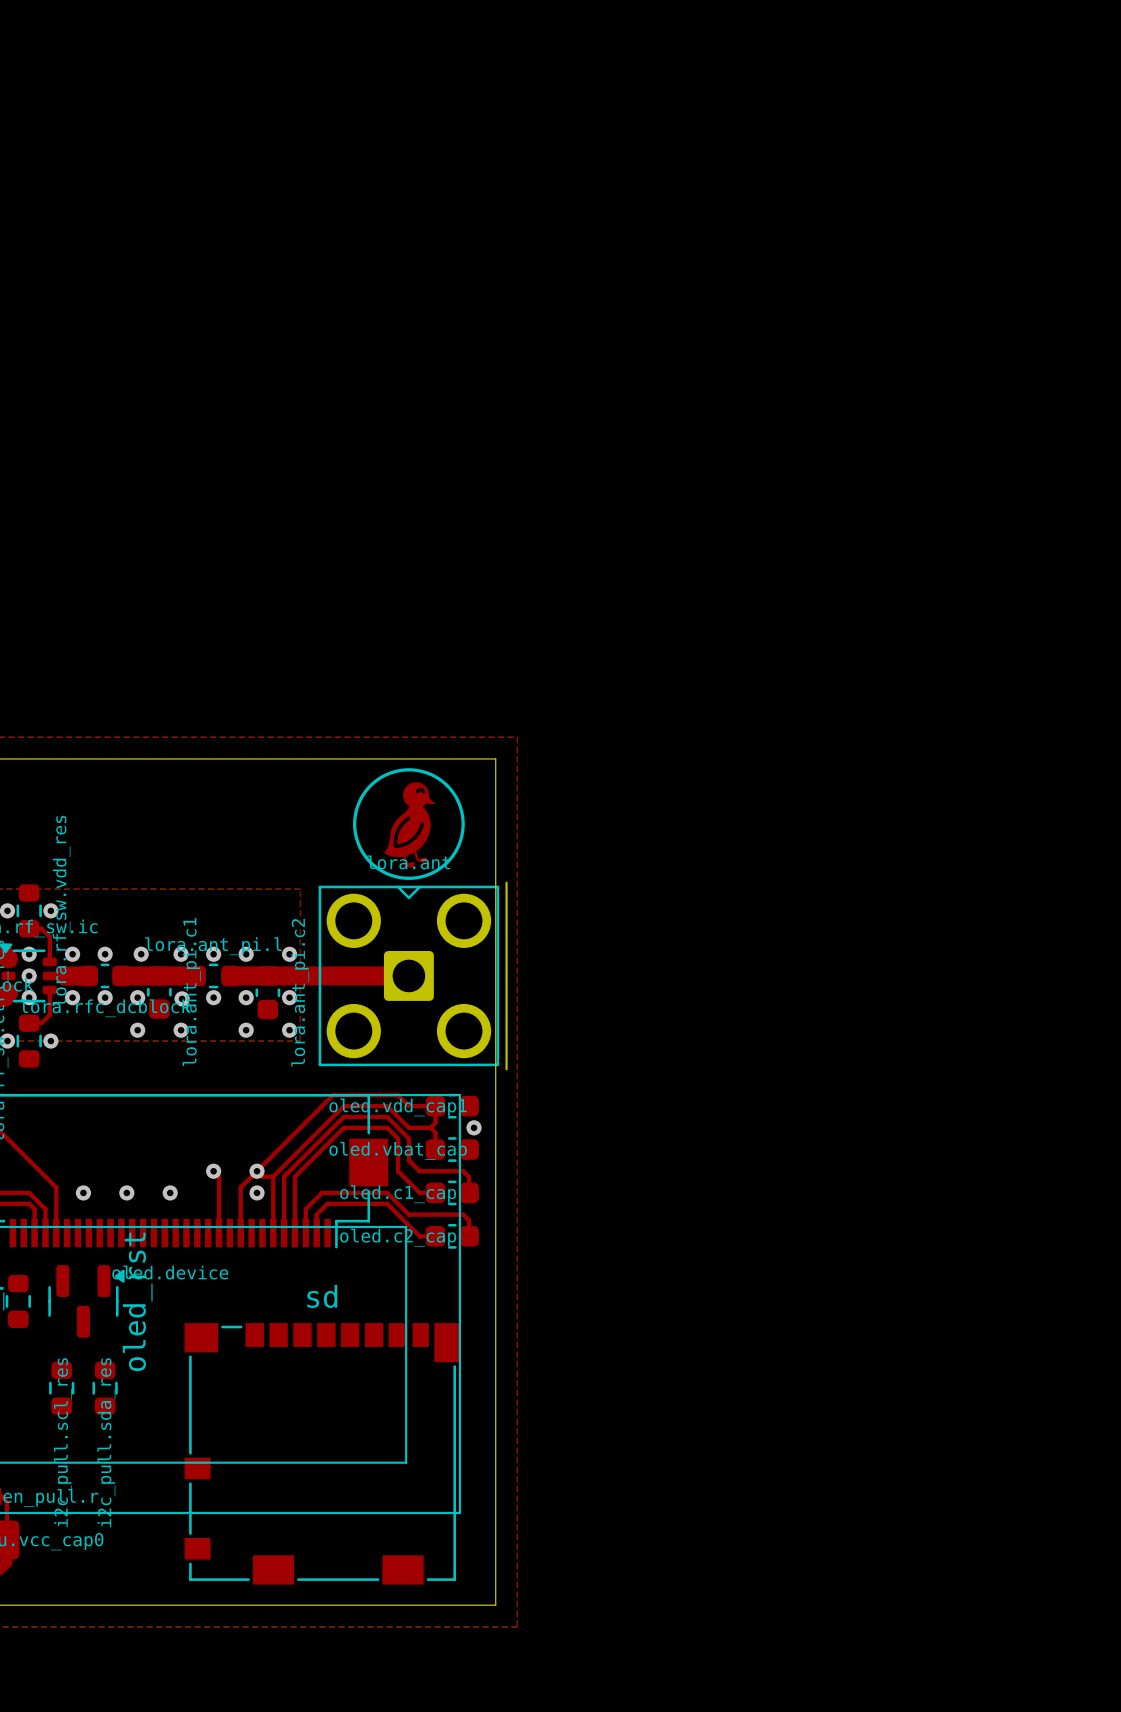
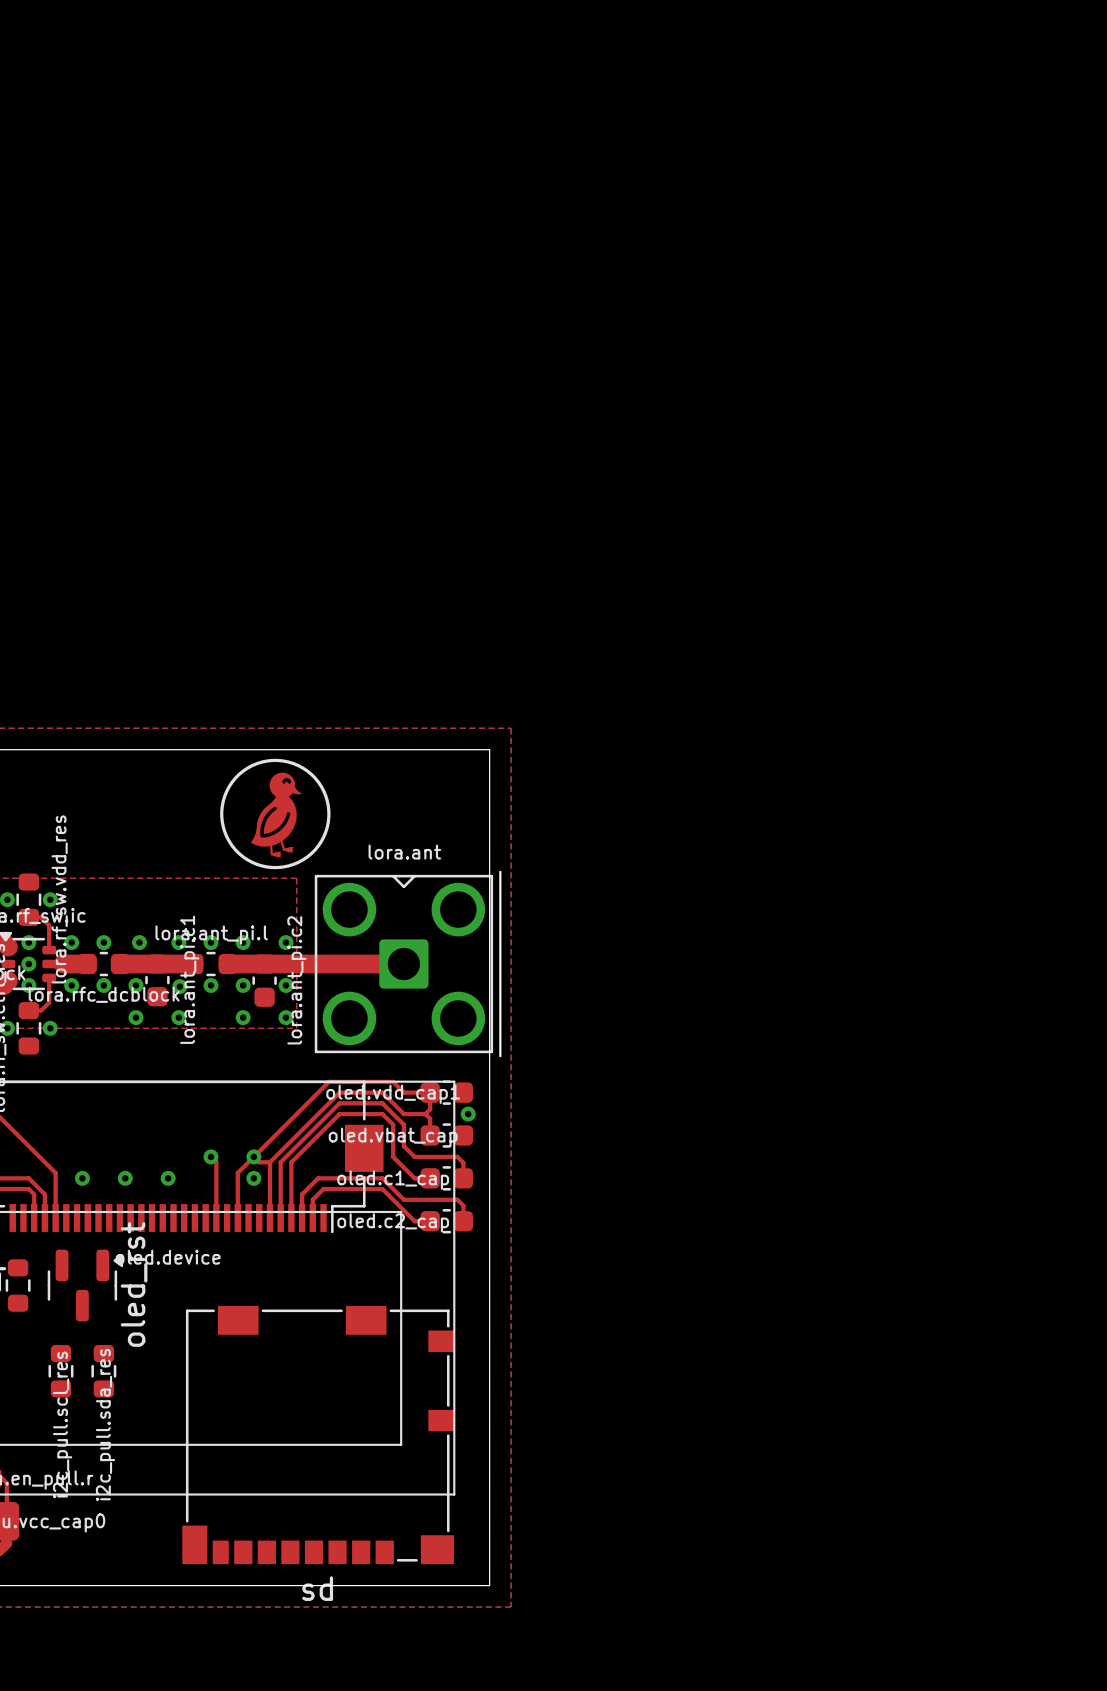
part position: (408, 824) -> (275, 813)
sd rotation: 0° (322, 1453) -> 180° (318, 1435)

